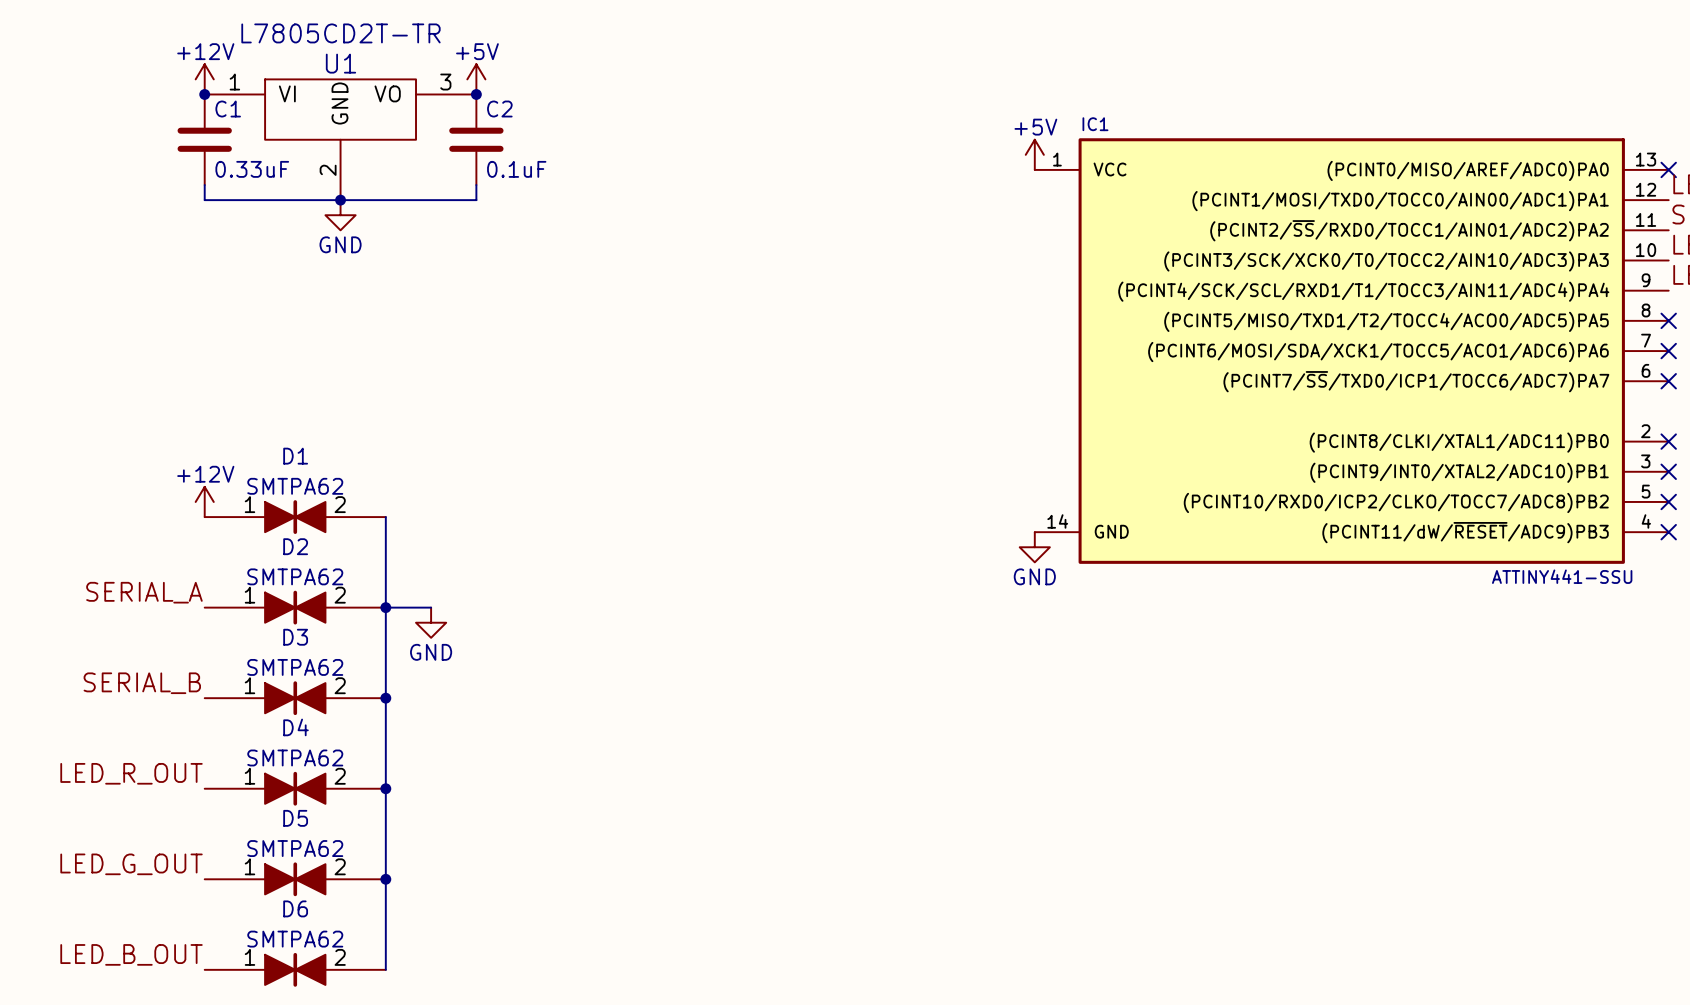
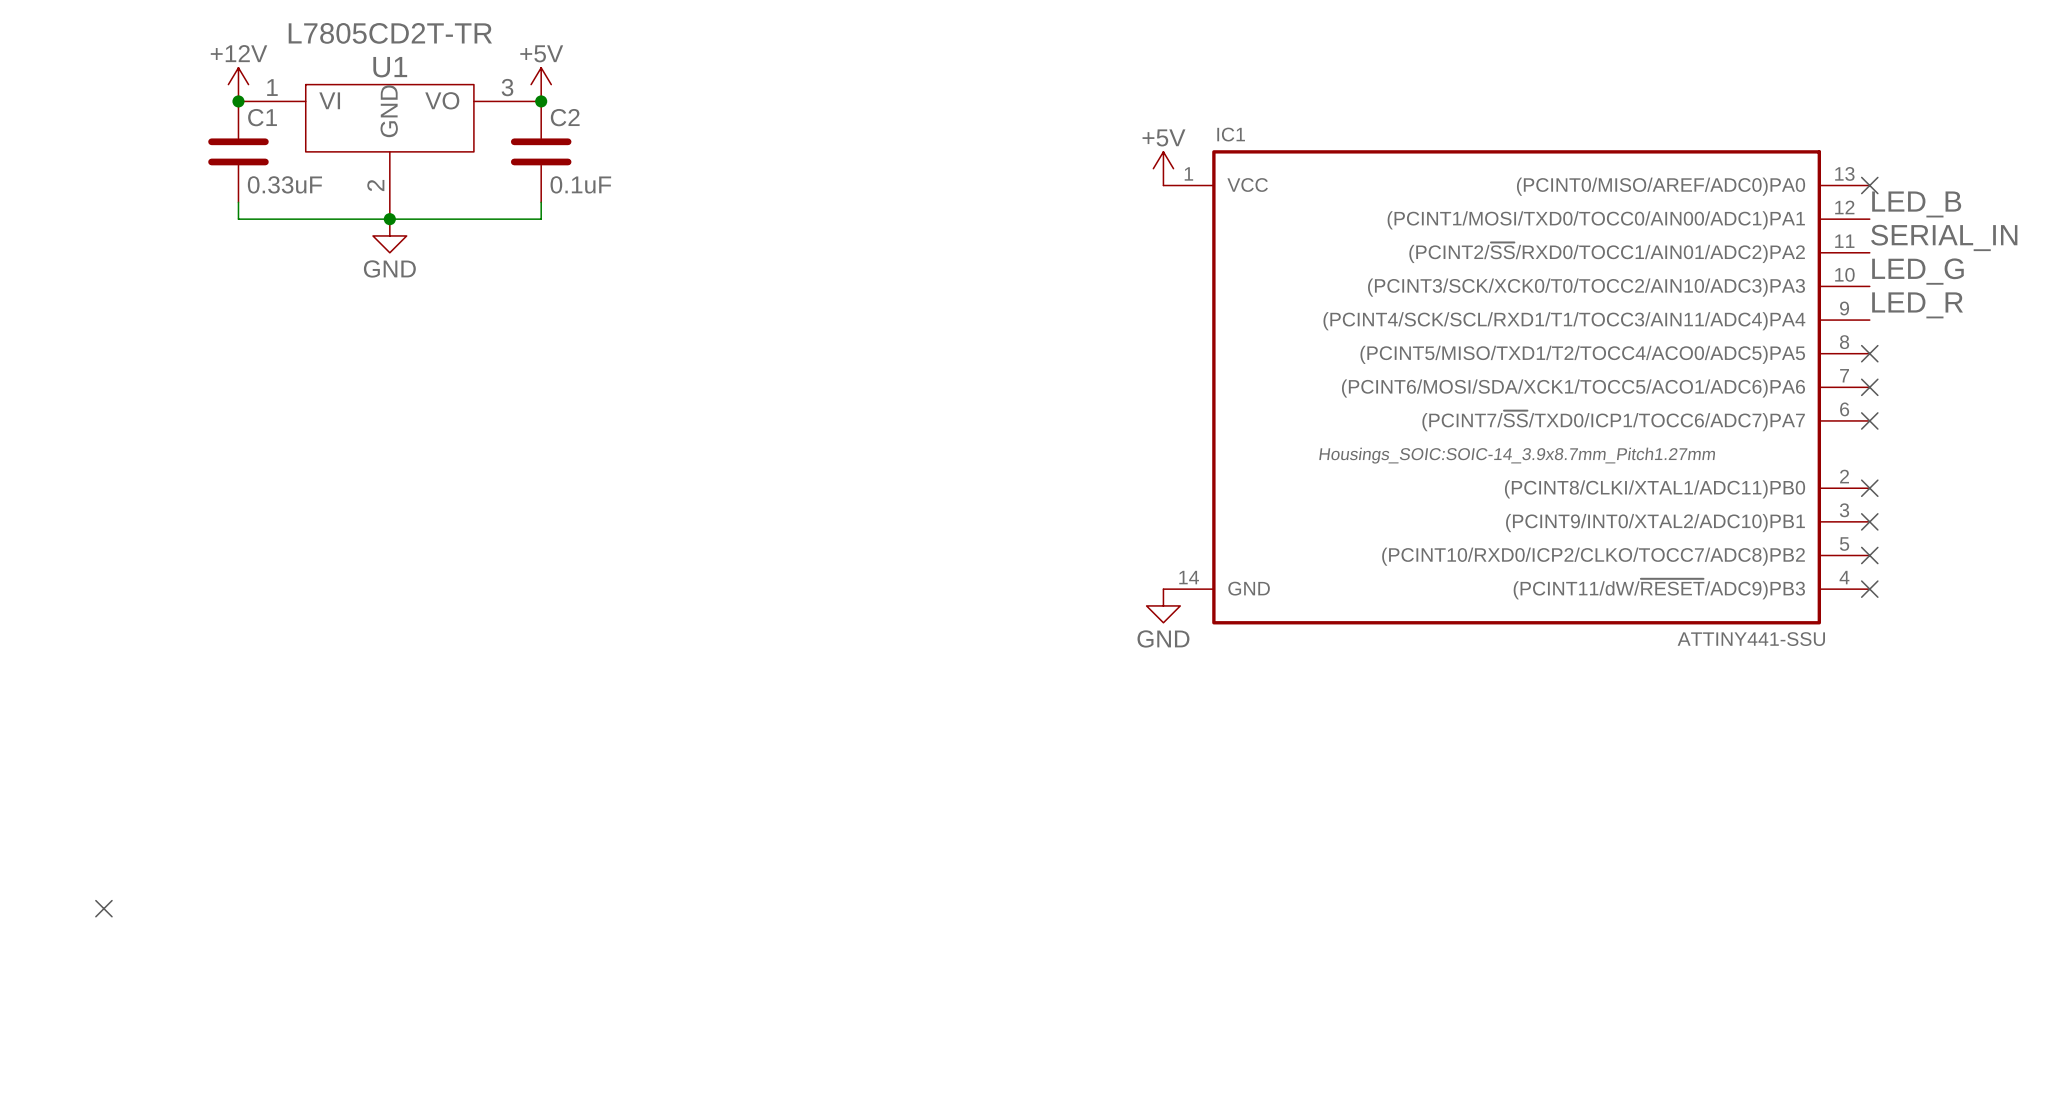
IC1 text: none -> Housings_SOIC:SOIC-14_3.9x8.7mm_Pitch1.27mm (1517, 455)
power symbol: +12V (204, 501) -> none
D1: SMTPA62 (295, 517) -> none
wire: (385, 517) (385, 969) -> none
label: SERIAL_A (144, 592) -> none
D2: SMTPA62 (295, 607) -> none
wire: (385, 607) (431, 607) -> none
junction: (385, 607) -> none
power symbol: GND (431, 622) -> none
label: SERIAL_B (142, 683) -> none
D3: SMTPA62 (295, 698) -> none
junction: (385, 698) -> none
label: LED_R_OUT (131, 773) -> none
D4: SMTPA62 (295, 788) -> none
junction: (385, 788) -> none
no-connect mark: none -> (103, 908)
label: LED_G_OUT (131, 864) -> none
D5: SMTPA62 (295, 879) -> none
junction: (385, 879) -> none
label: LED_B_OUT (131, 954) -> none
D6: SMTPA62 (295, 969) -> none

